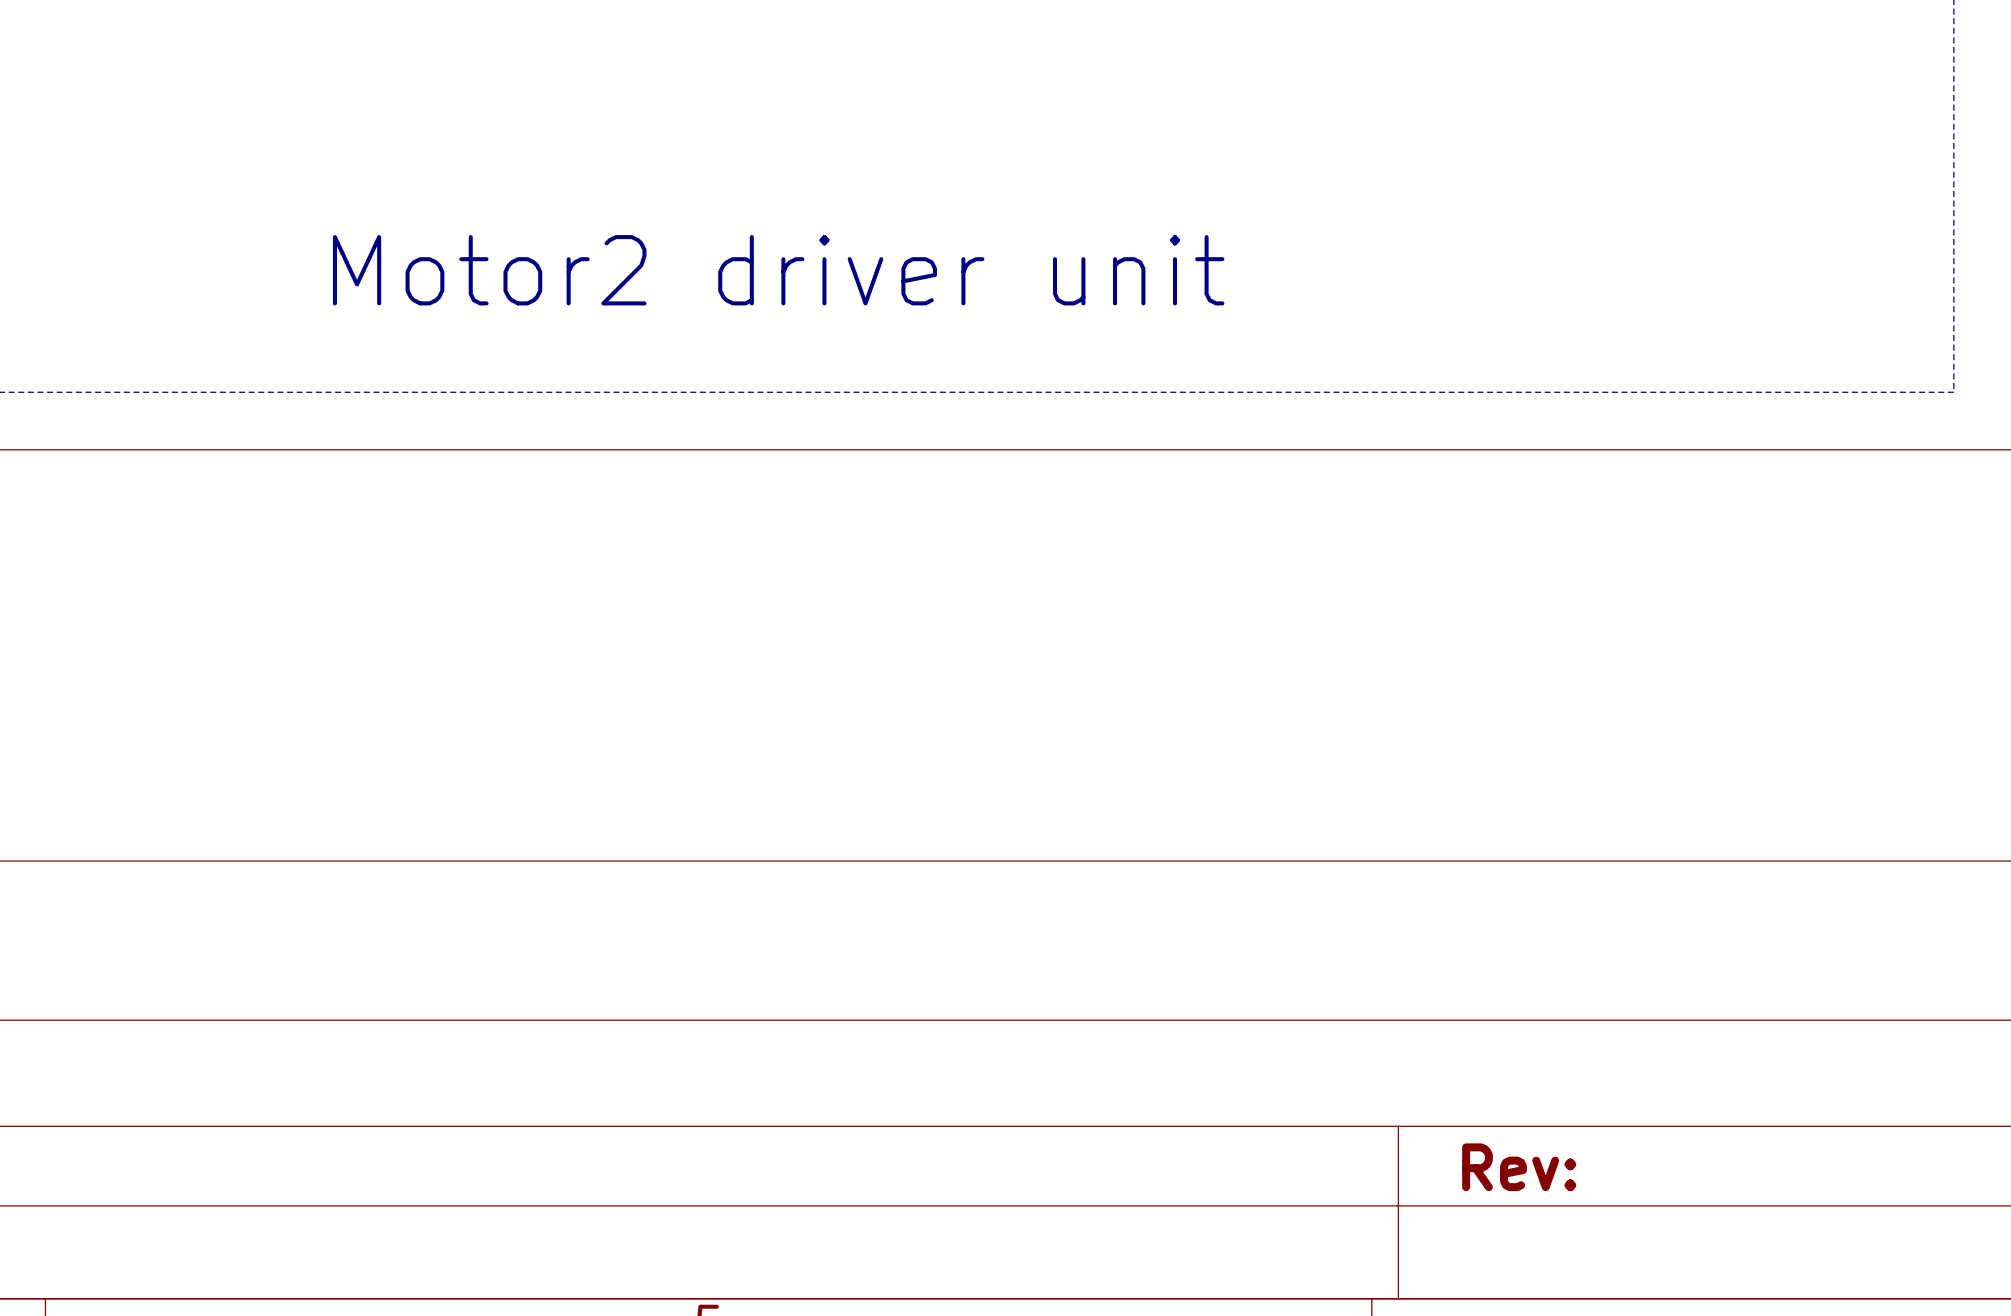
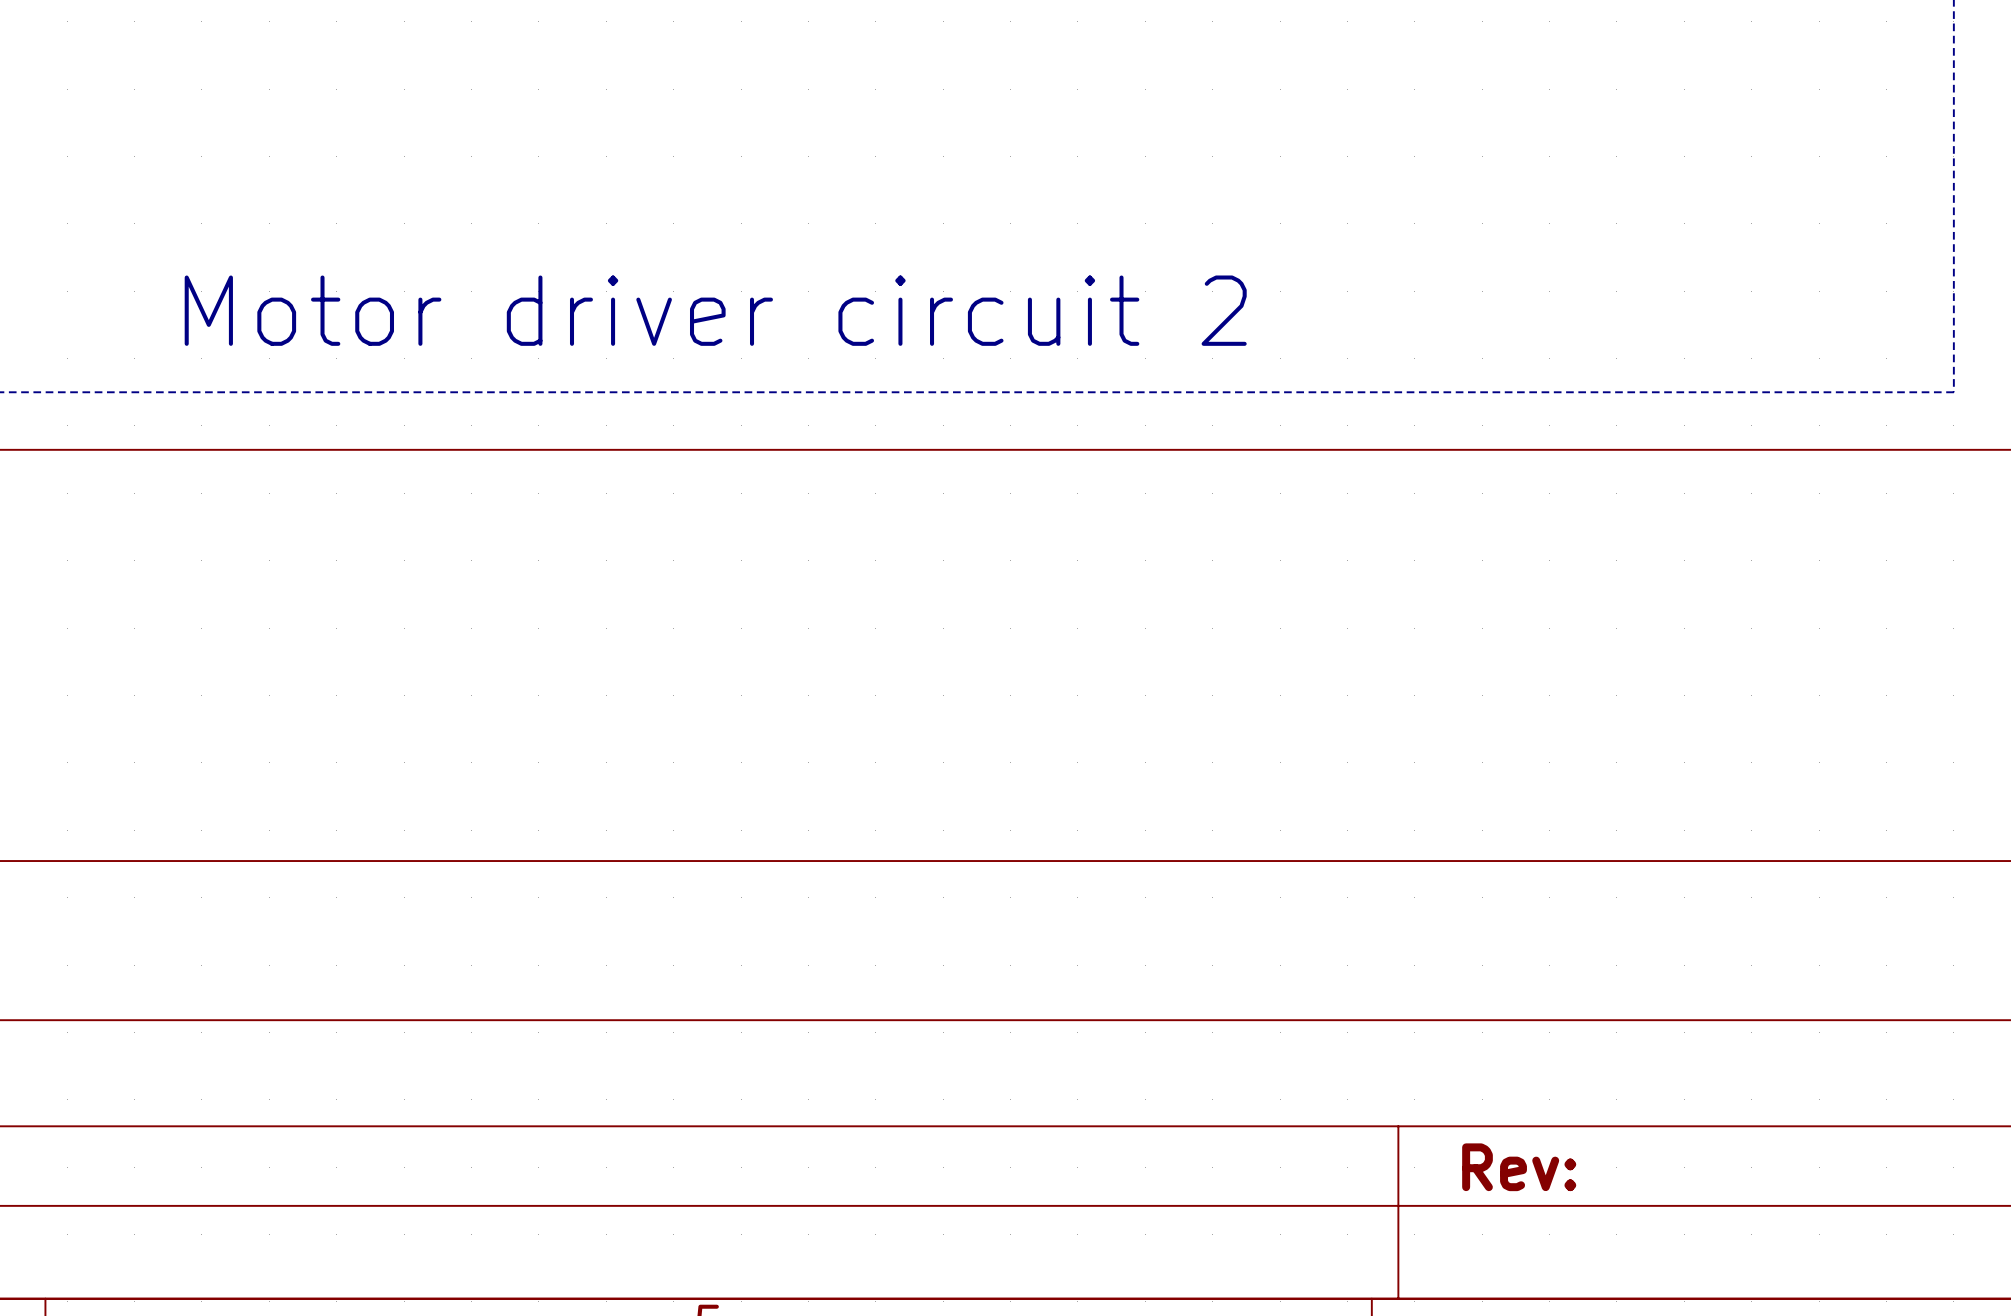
text: Motor2 driver unit (778, 270) -> Motor driver circuit 2 (715, 310)

